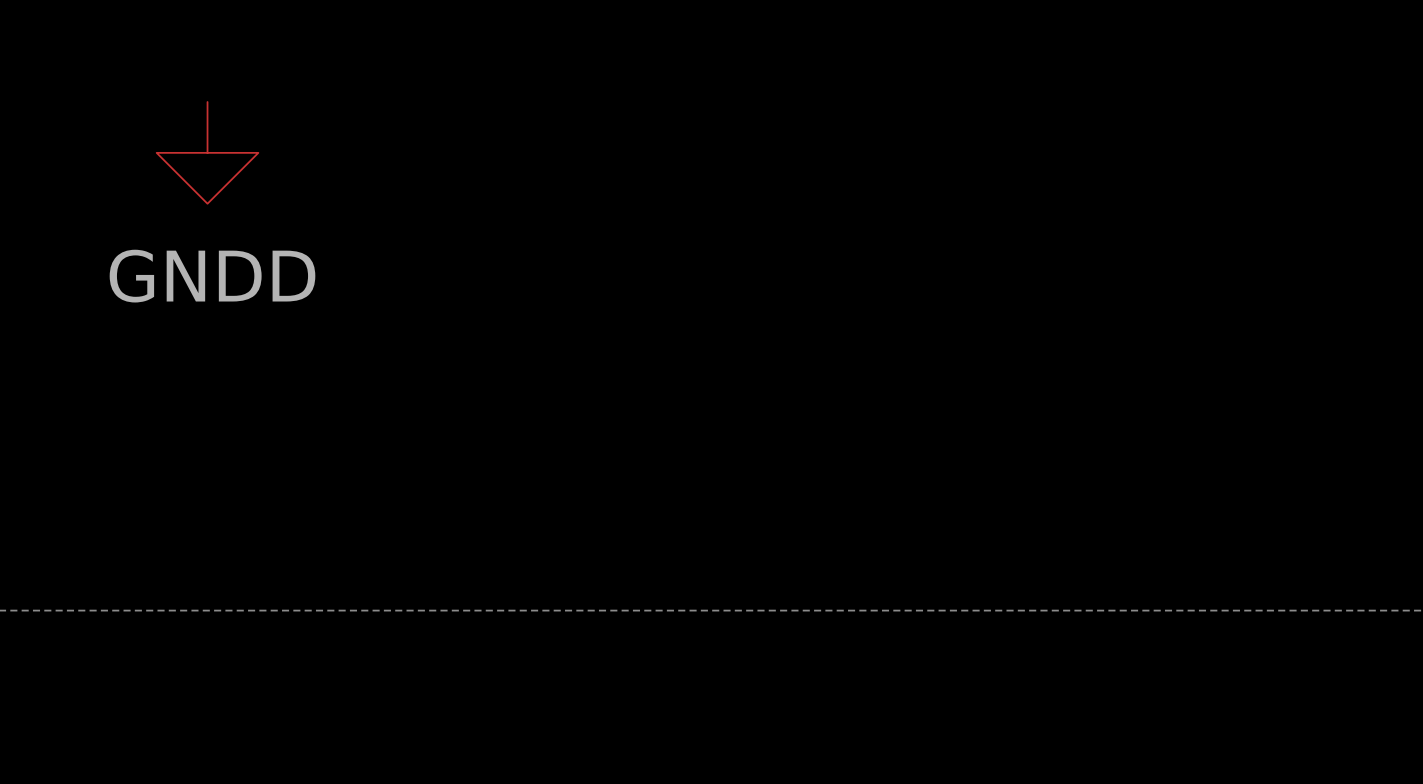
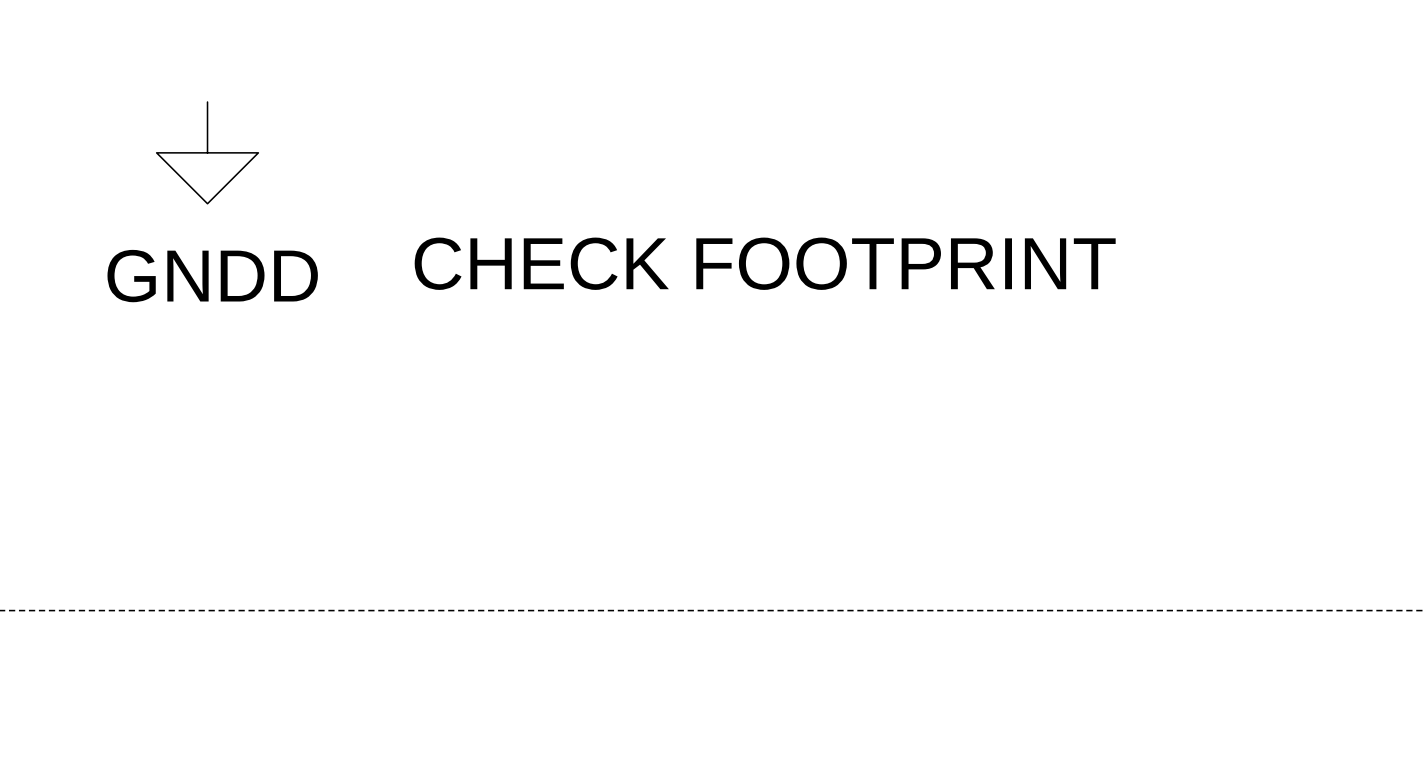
text: none -> CHECK FOOTPRINT (765, 263)

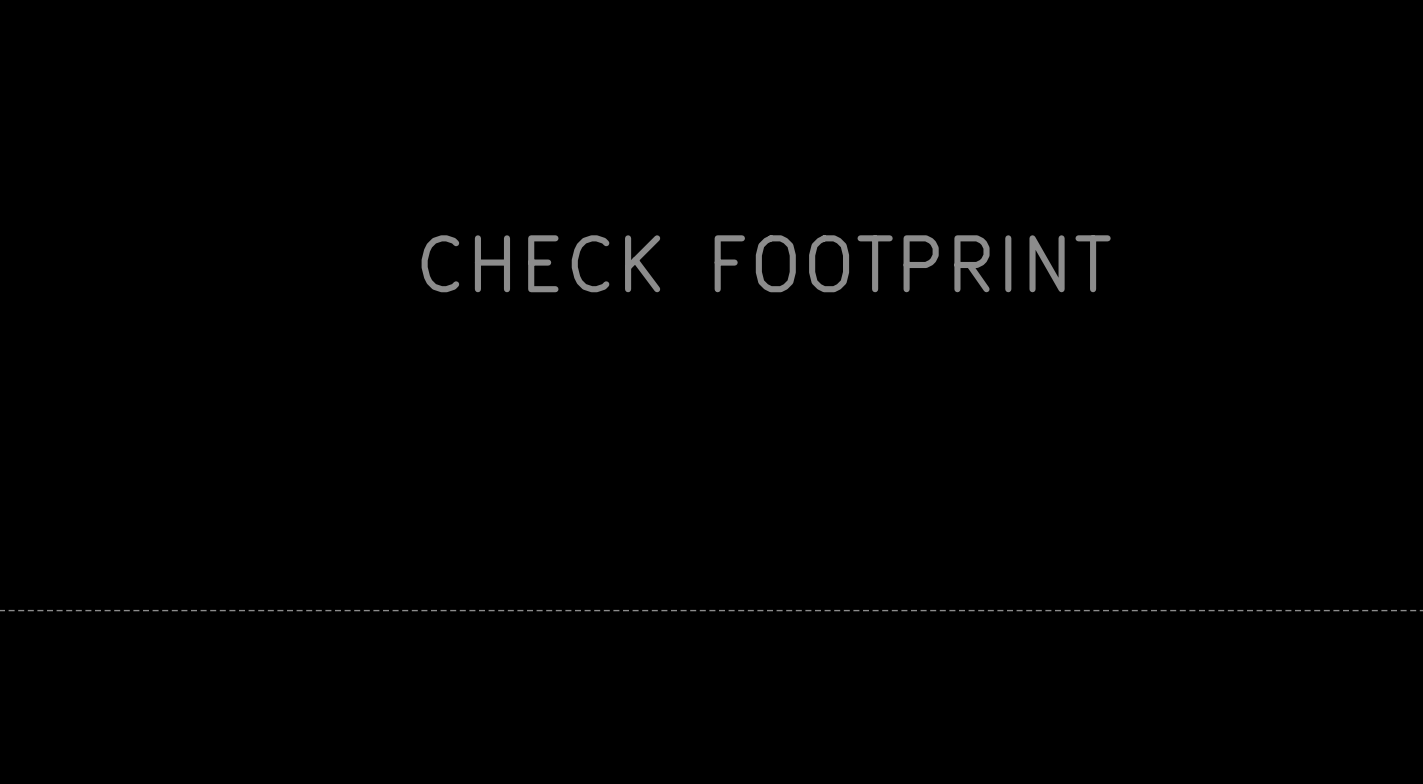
power symbol: GNDD (207, 152) -> none

